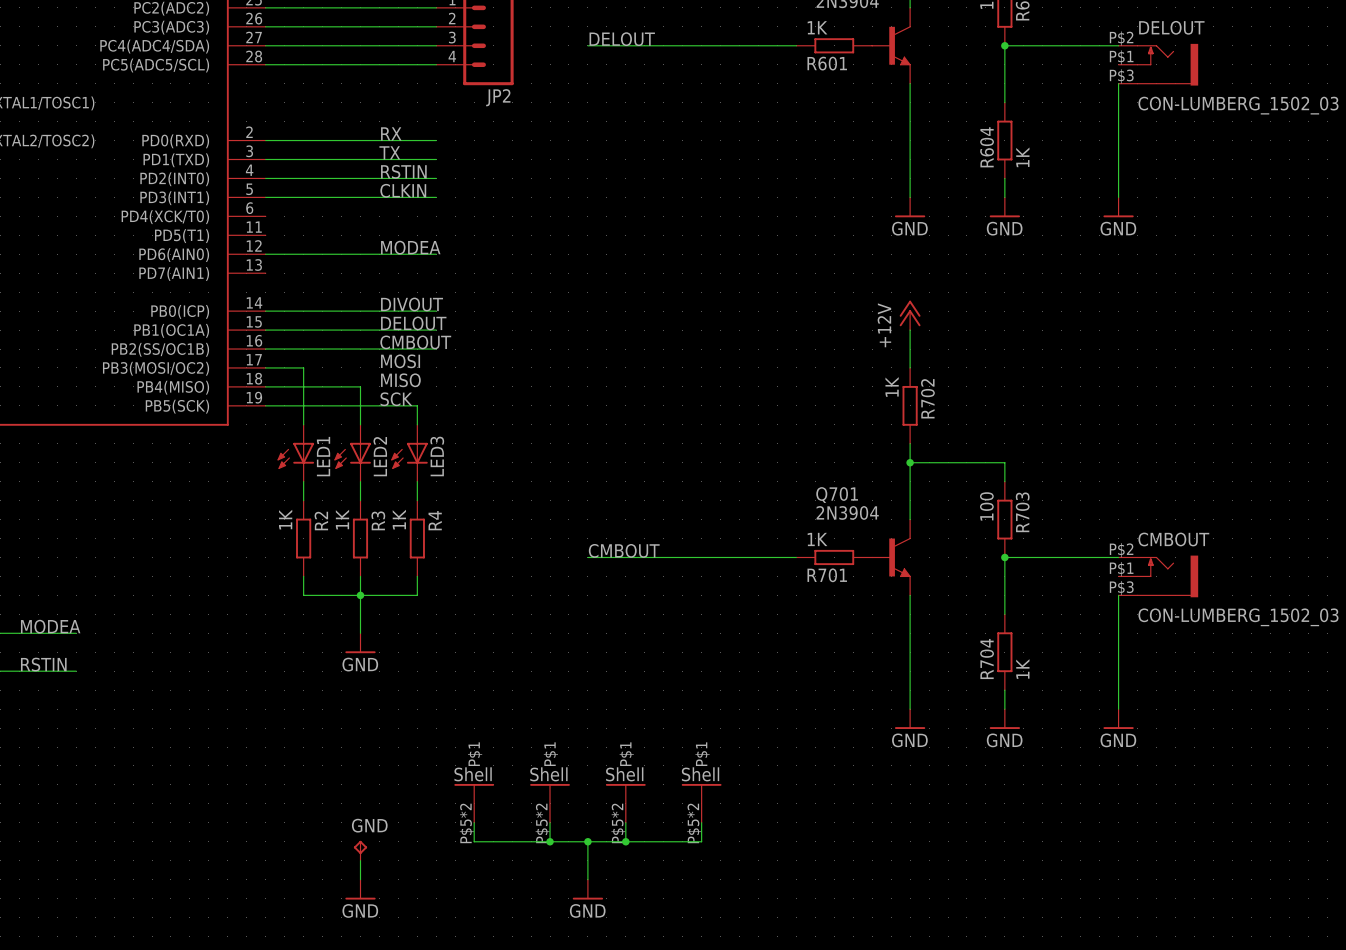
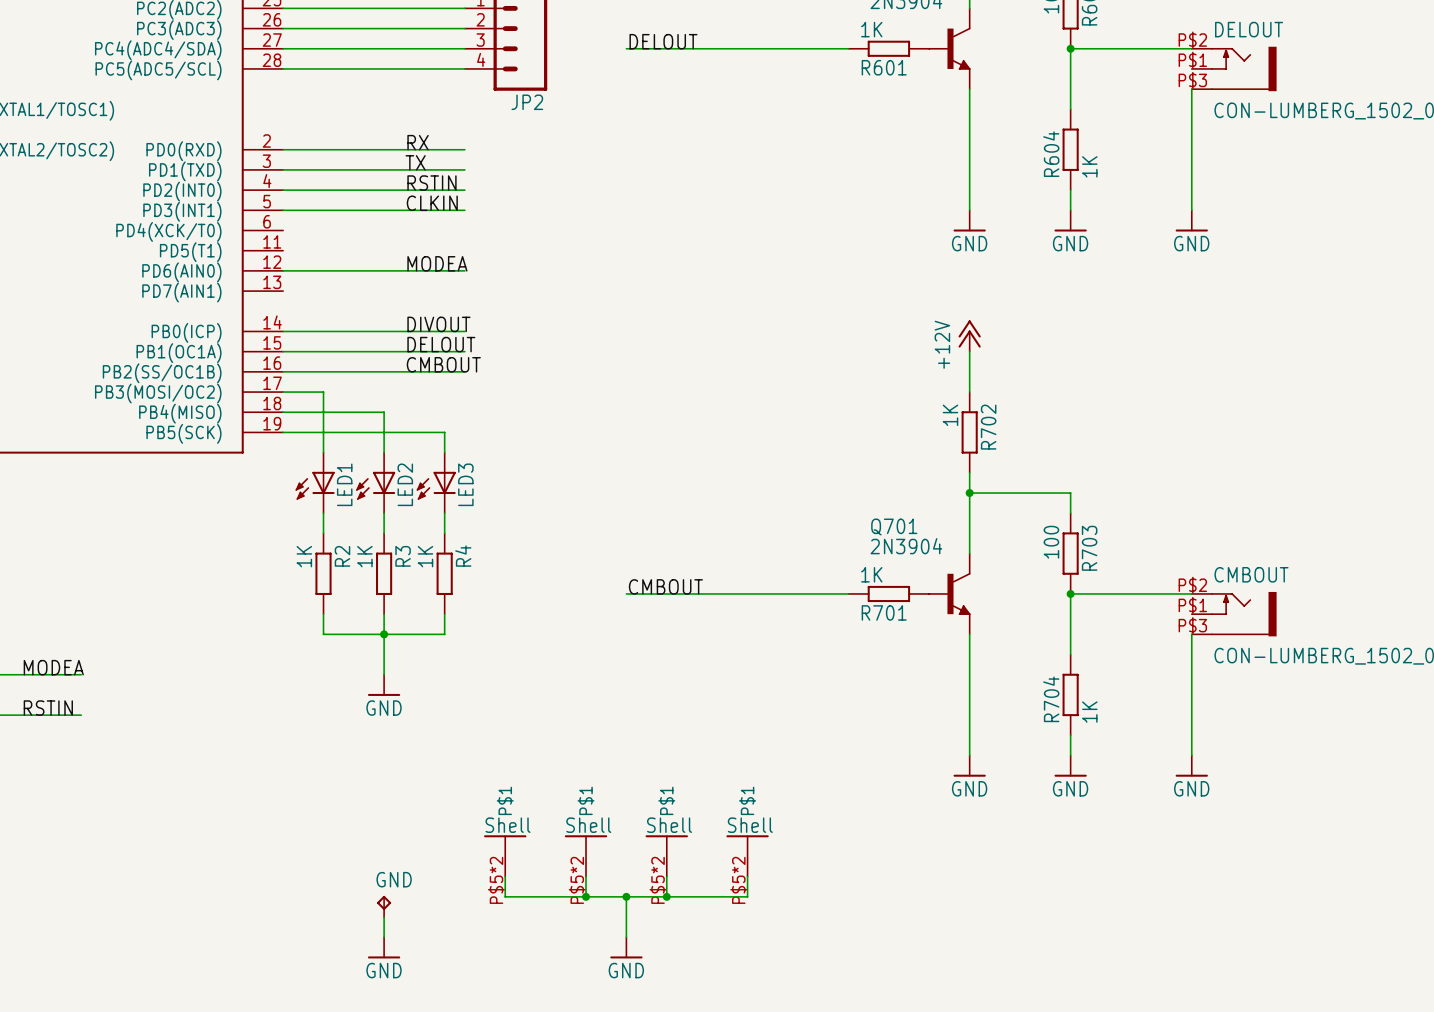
label: MOSI (400, 361) -> none
label: MISO (400, 380) -> none
label: SCK (396, 399) -> none

